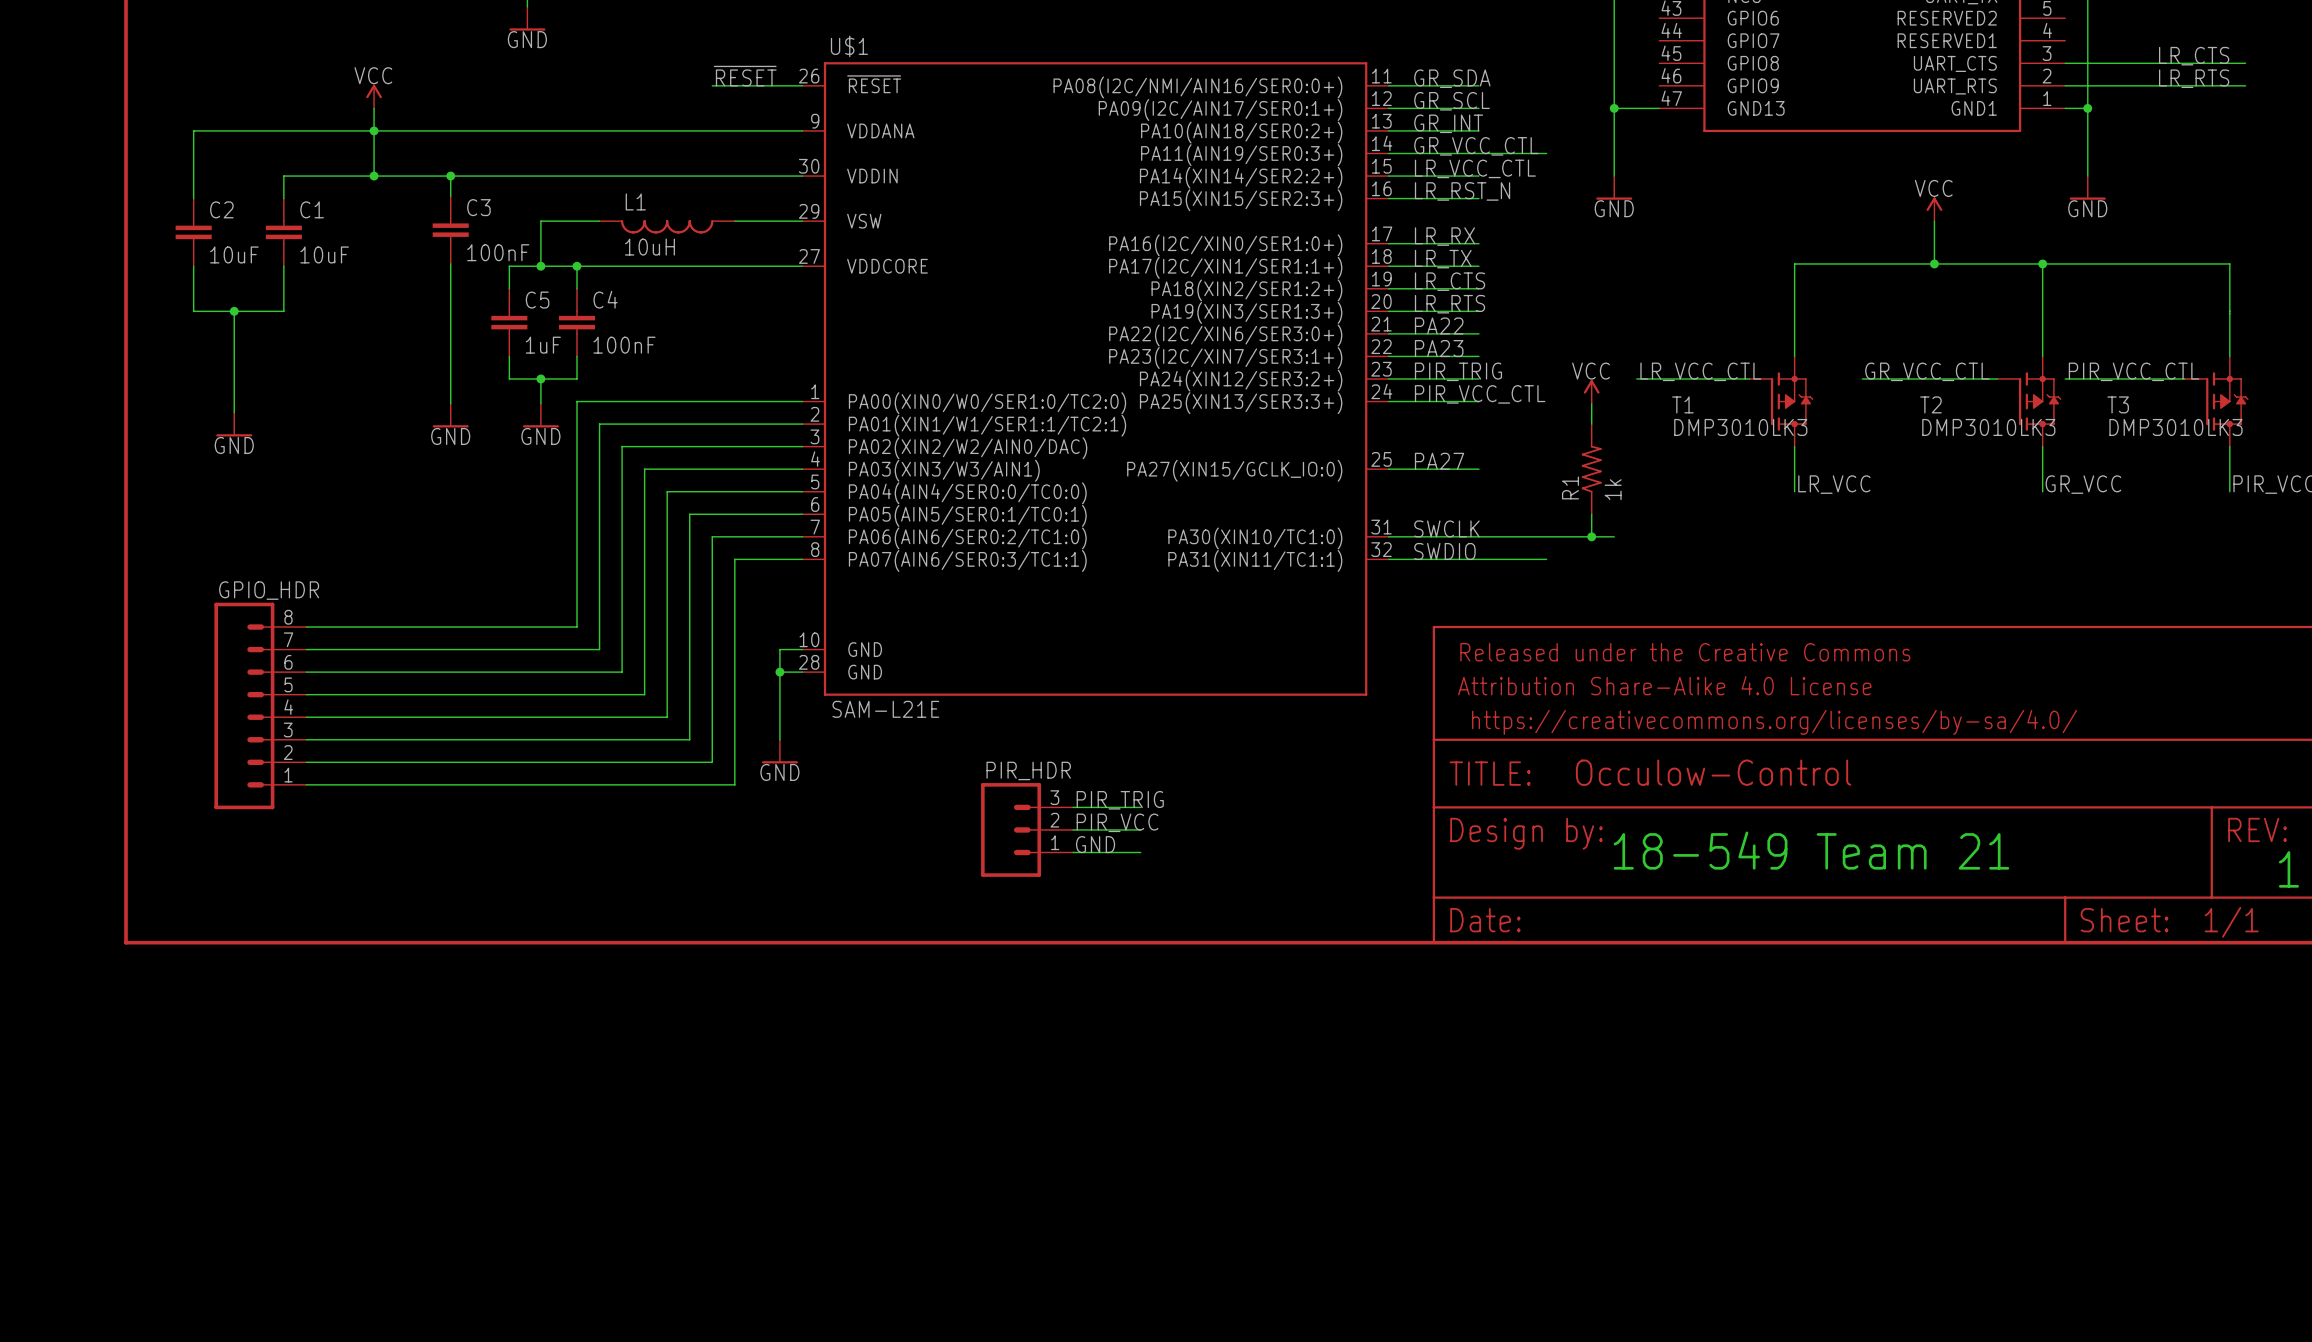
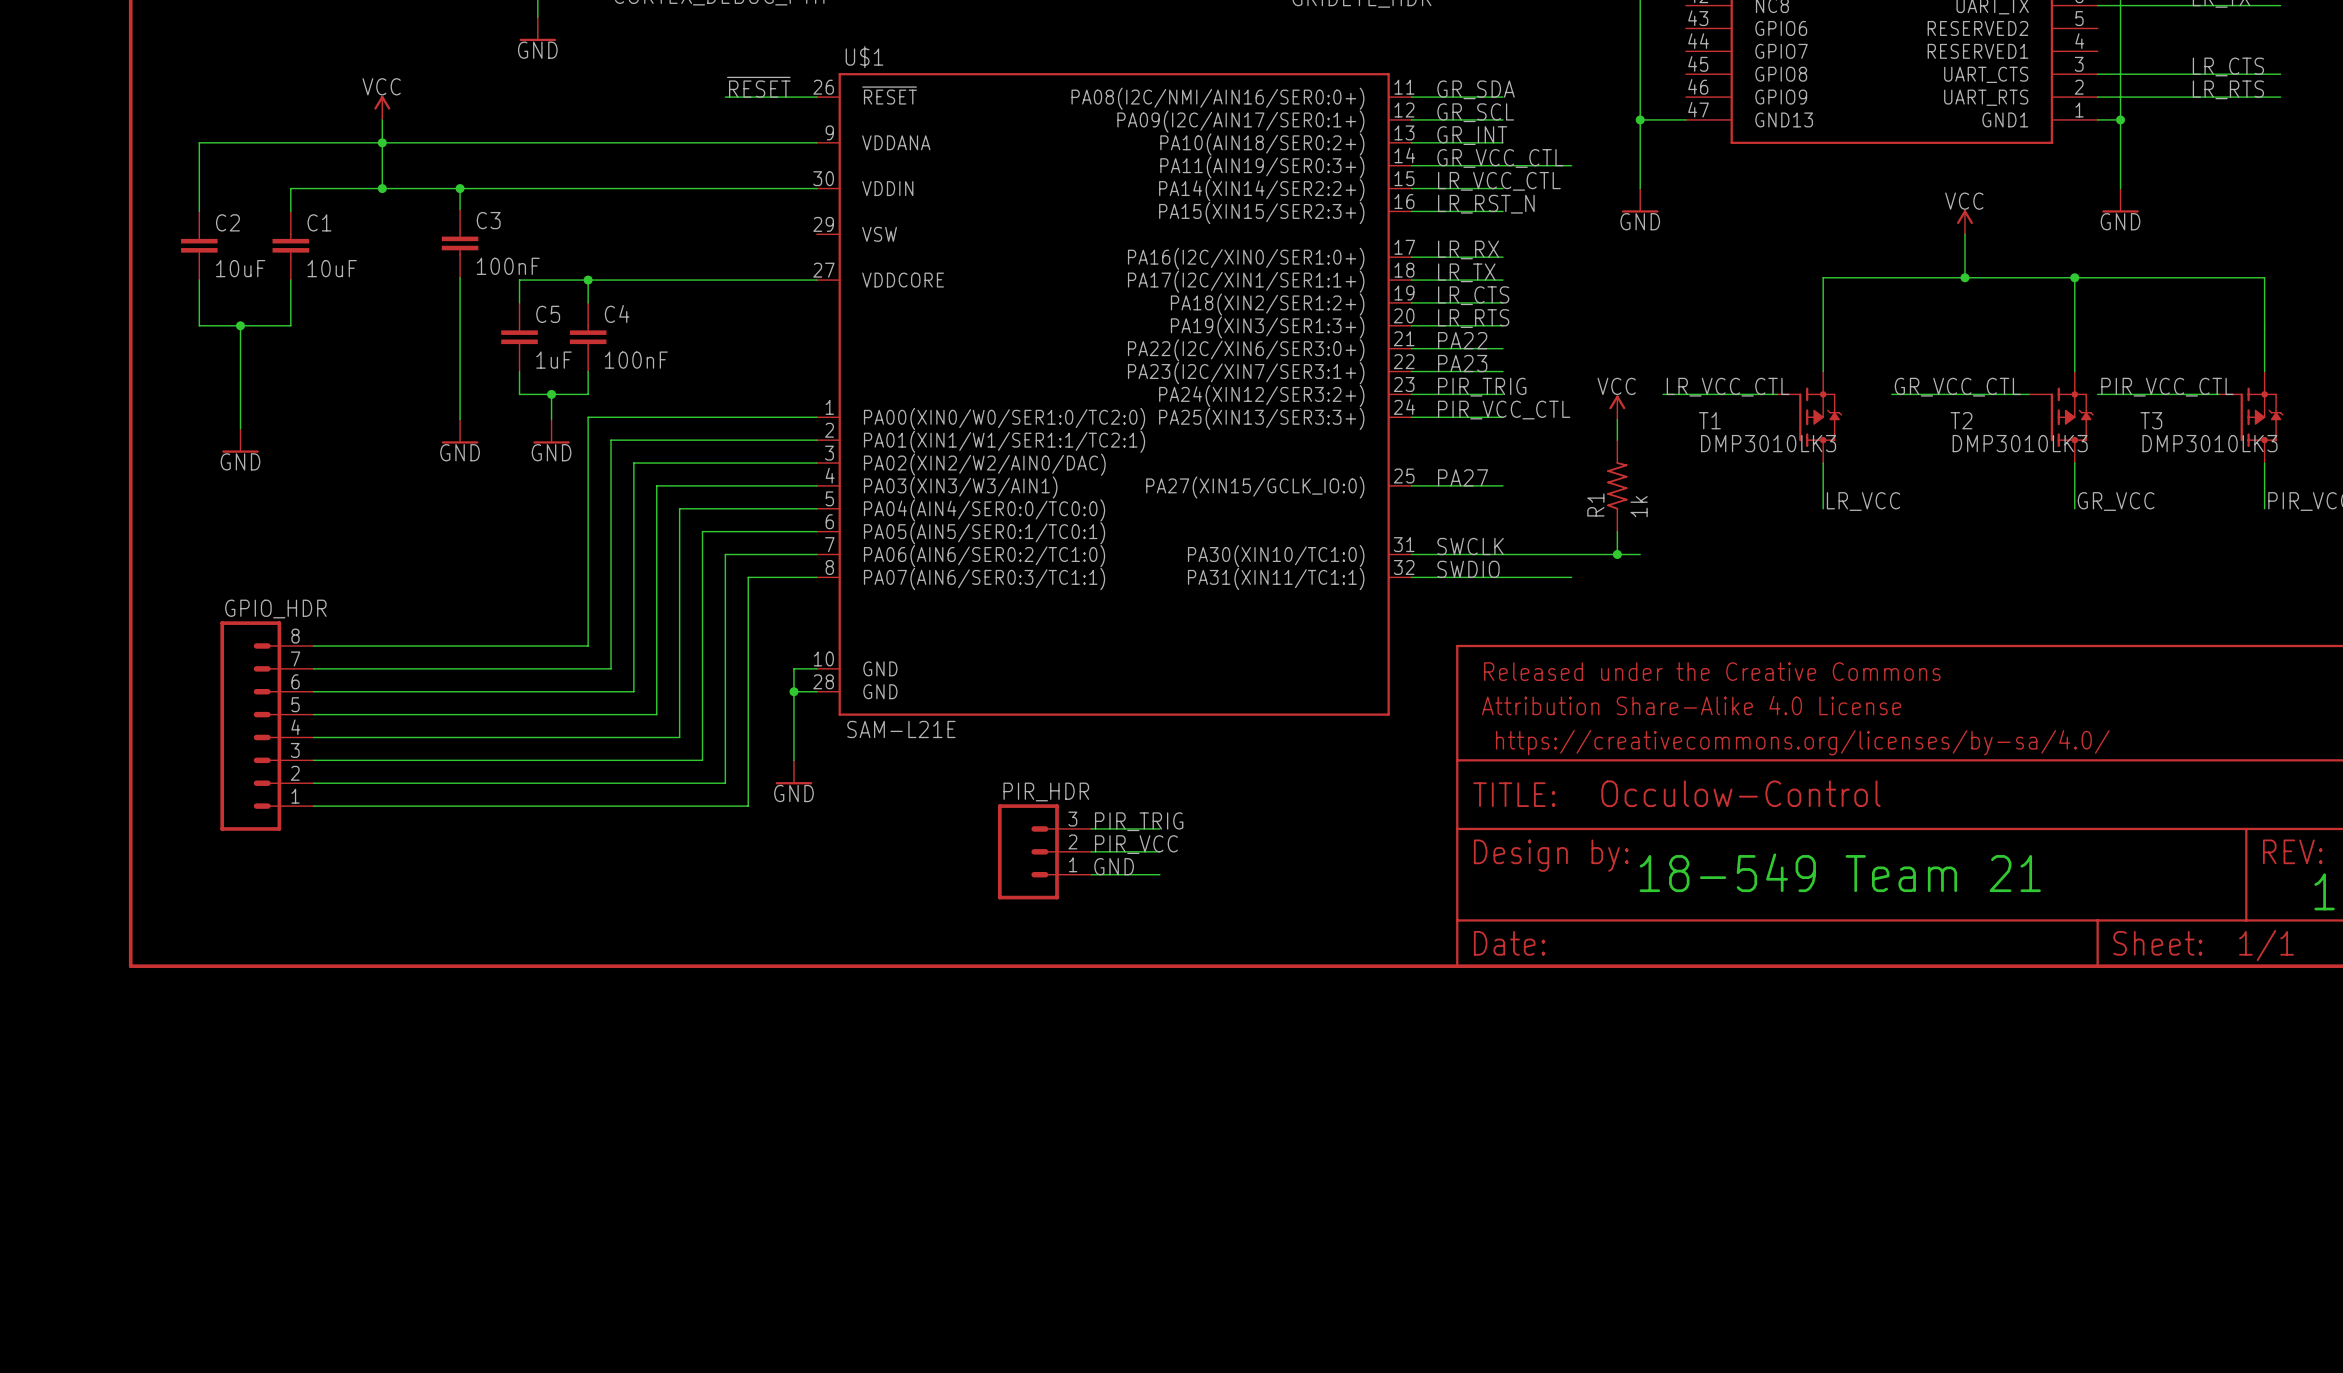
wire: (599, 221) (540, 221) (540, 266) -> none
wire: (734, 221) (802, 221) -> none
L1: 10uH (667, 226) -> none
junction: (540, 266) -> none

